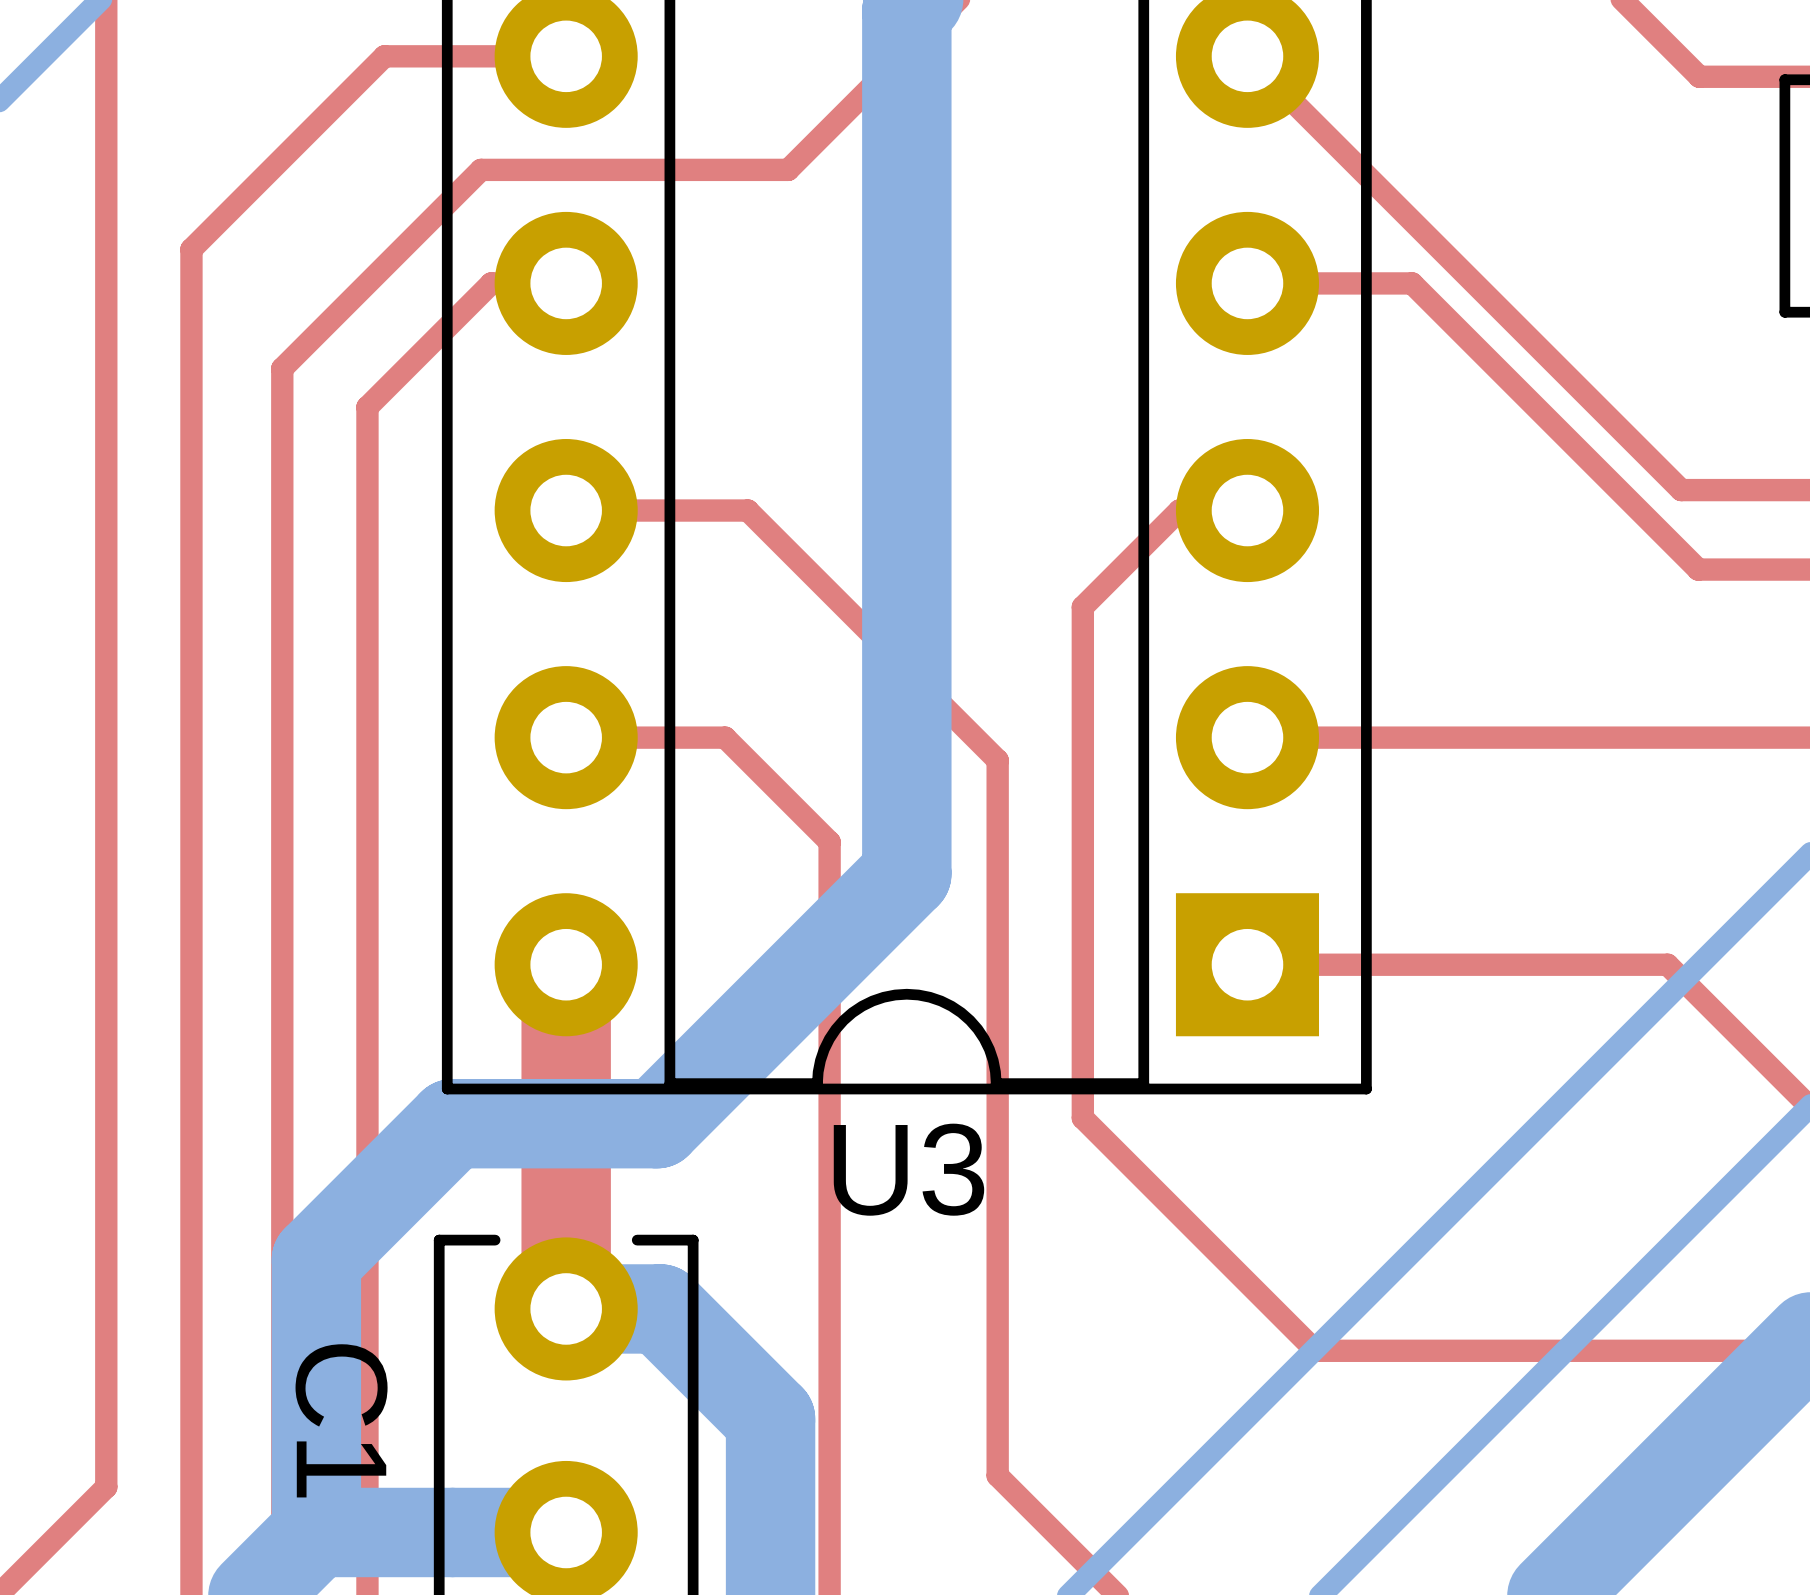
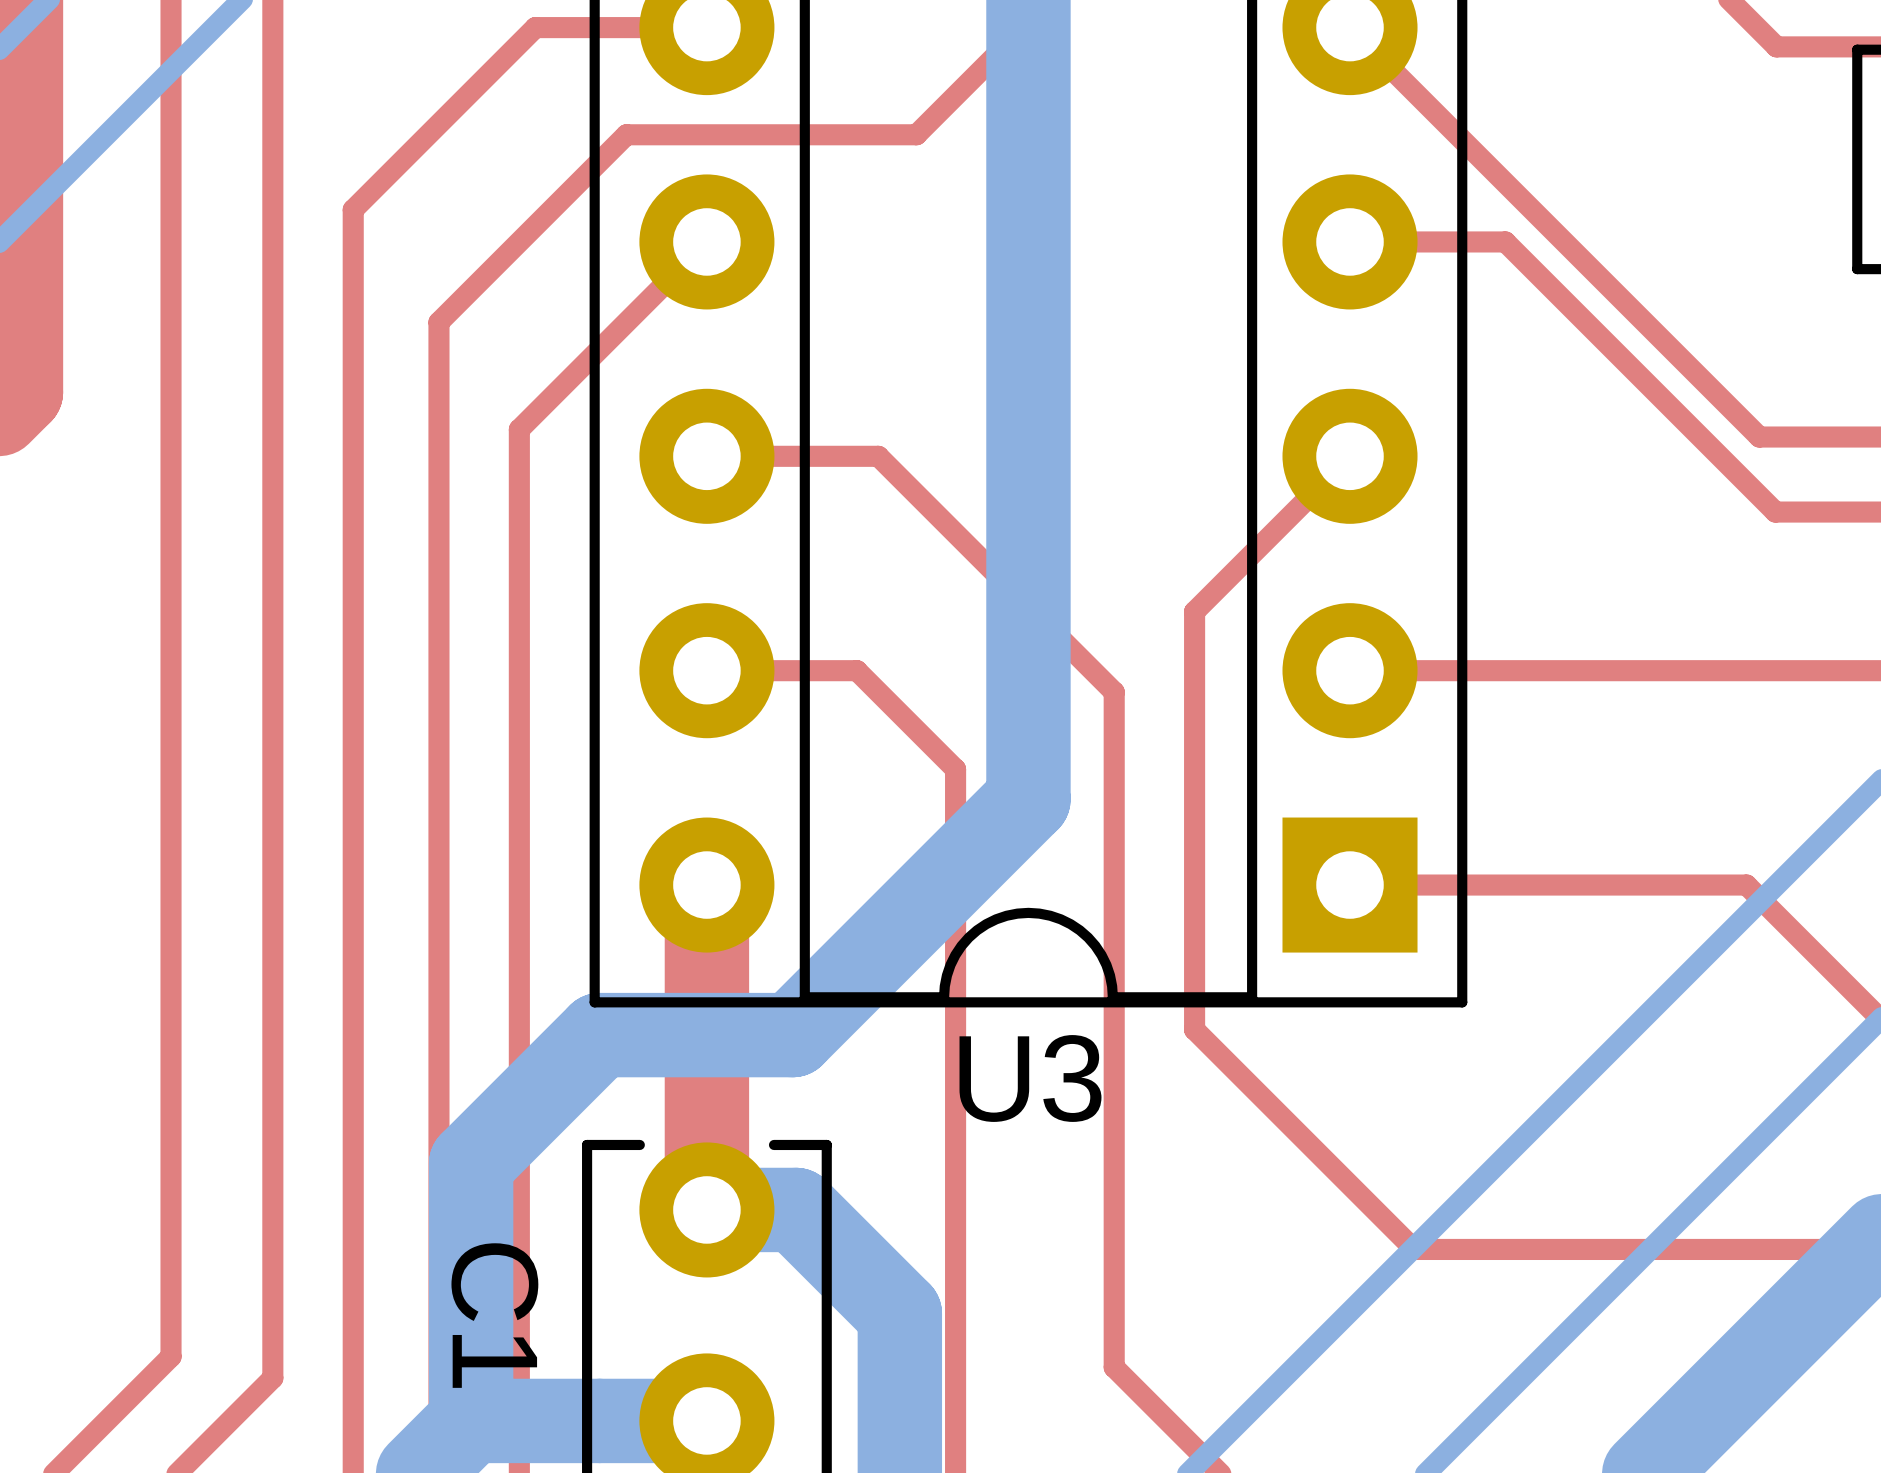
top track: (566, 283) (491, 283) (367, 407) (367, 482) -> (706, 241) (519, 429)
top track: (1247, 510) (1179, 510) (1082, 607) (1082, 675) -> (1350, 456) (1194, 611)

